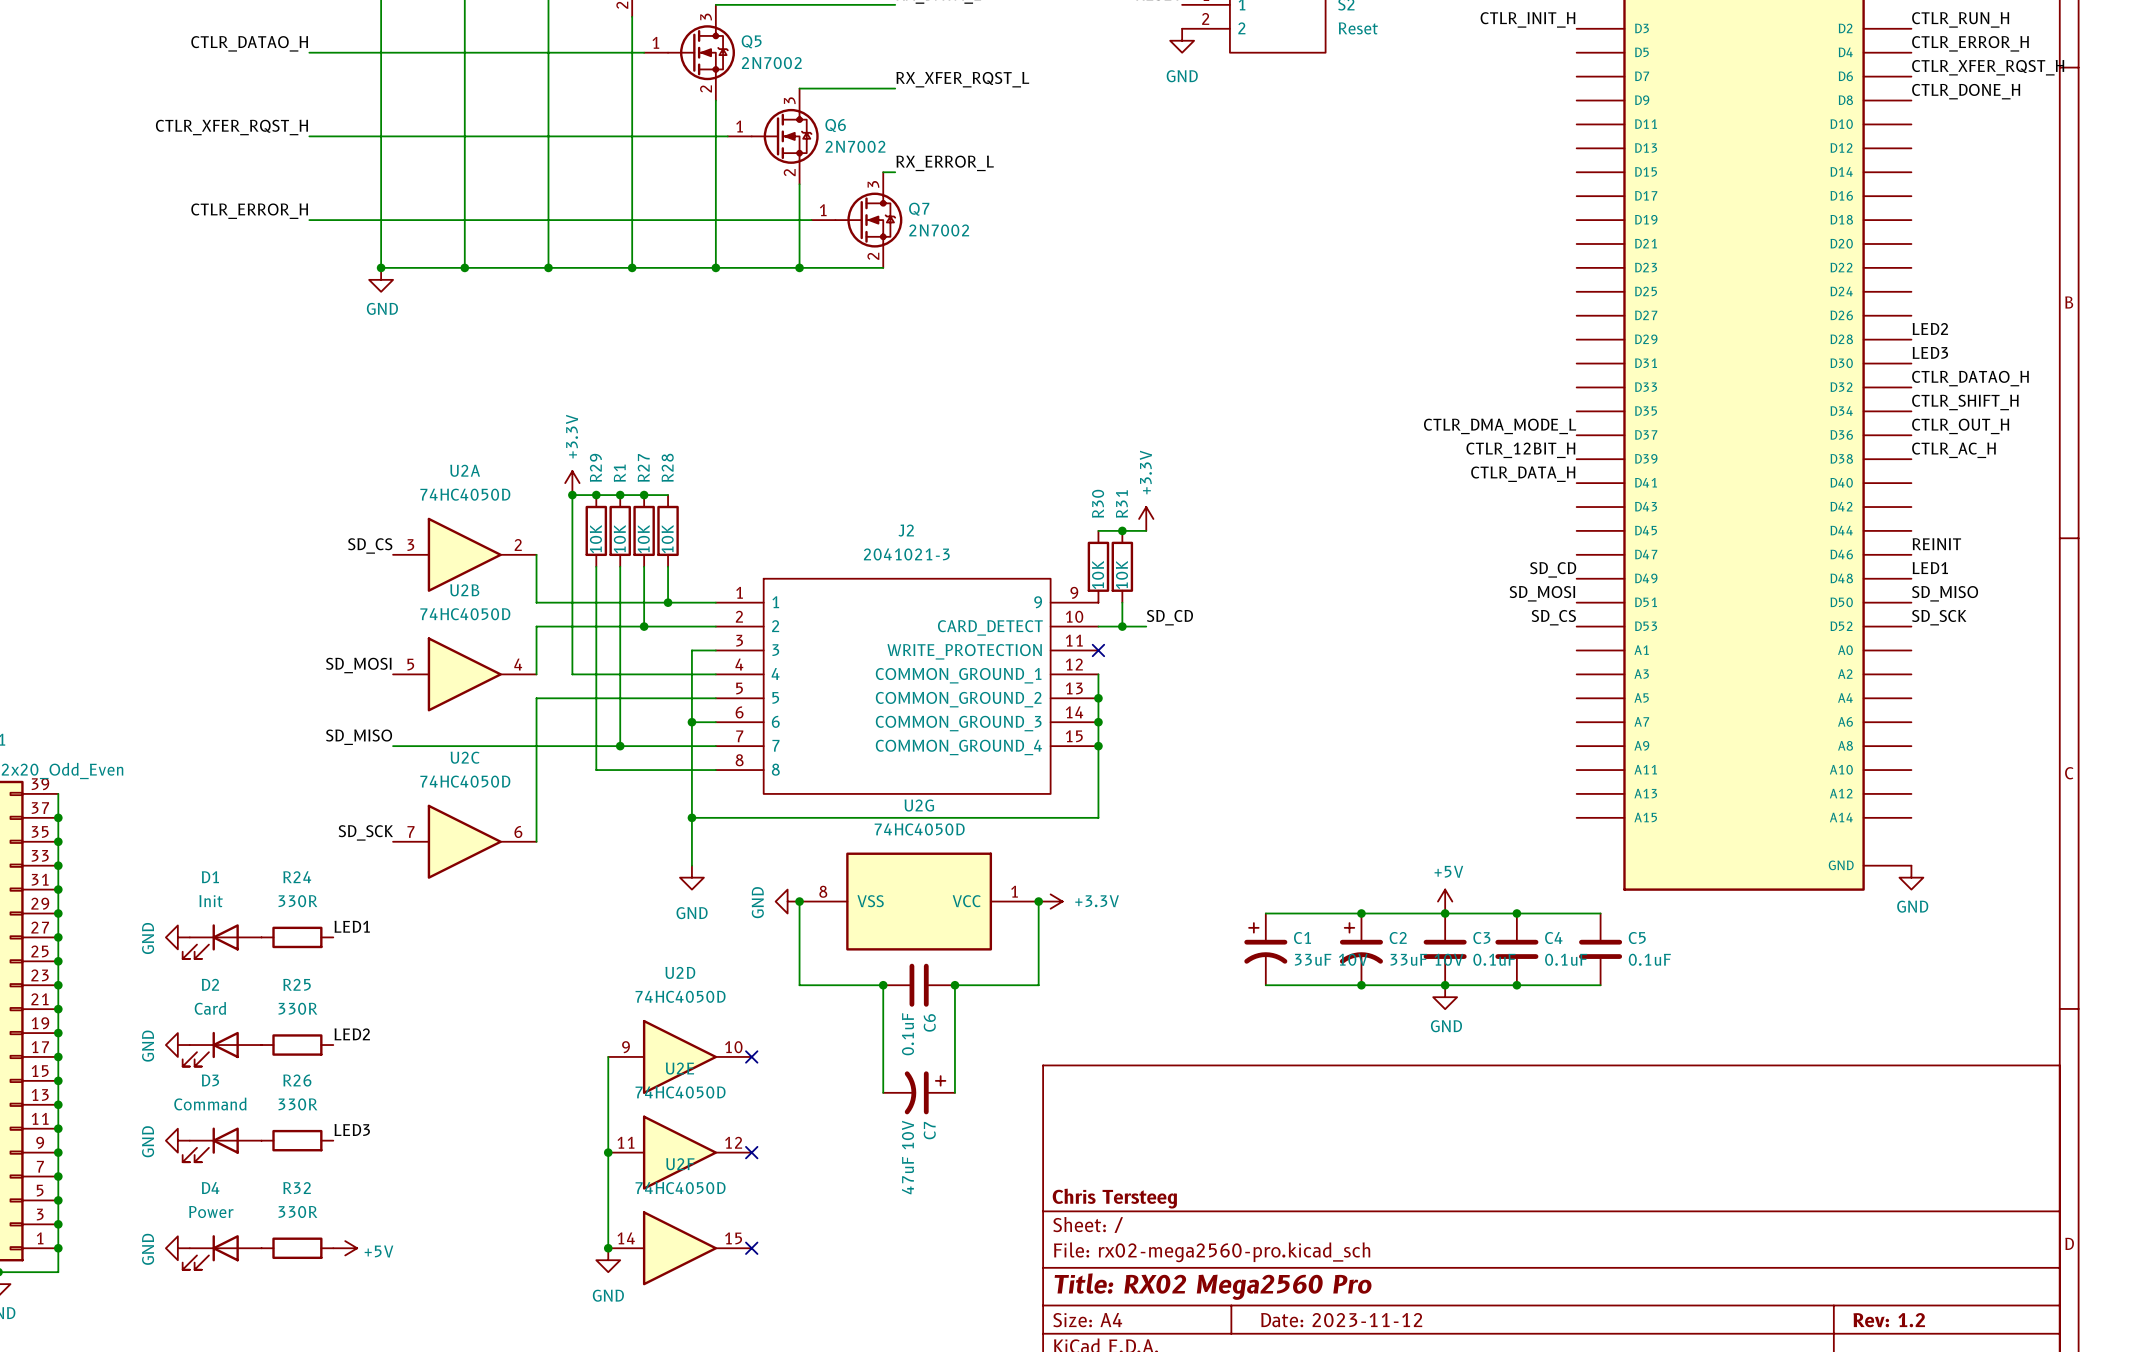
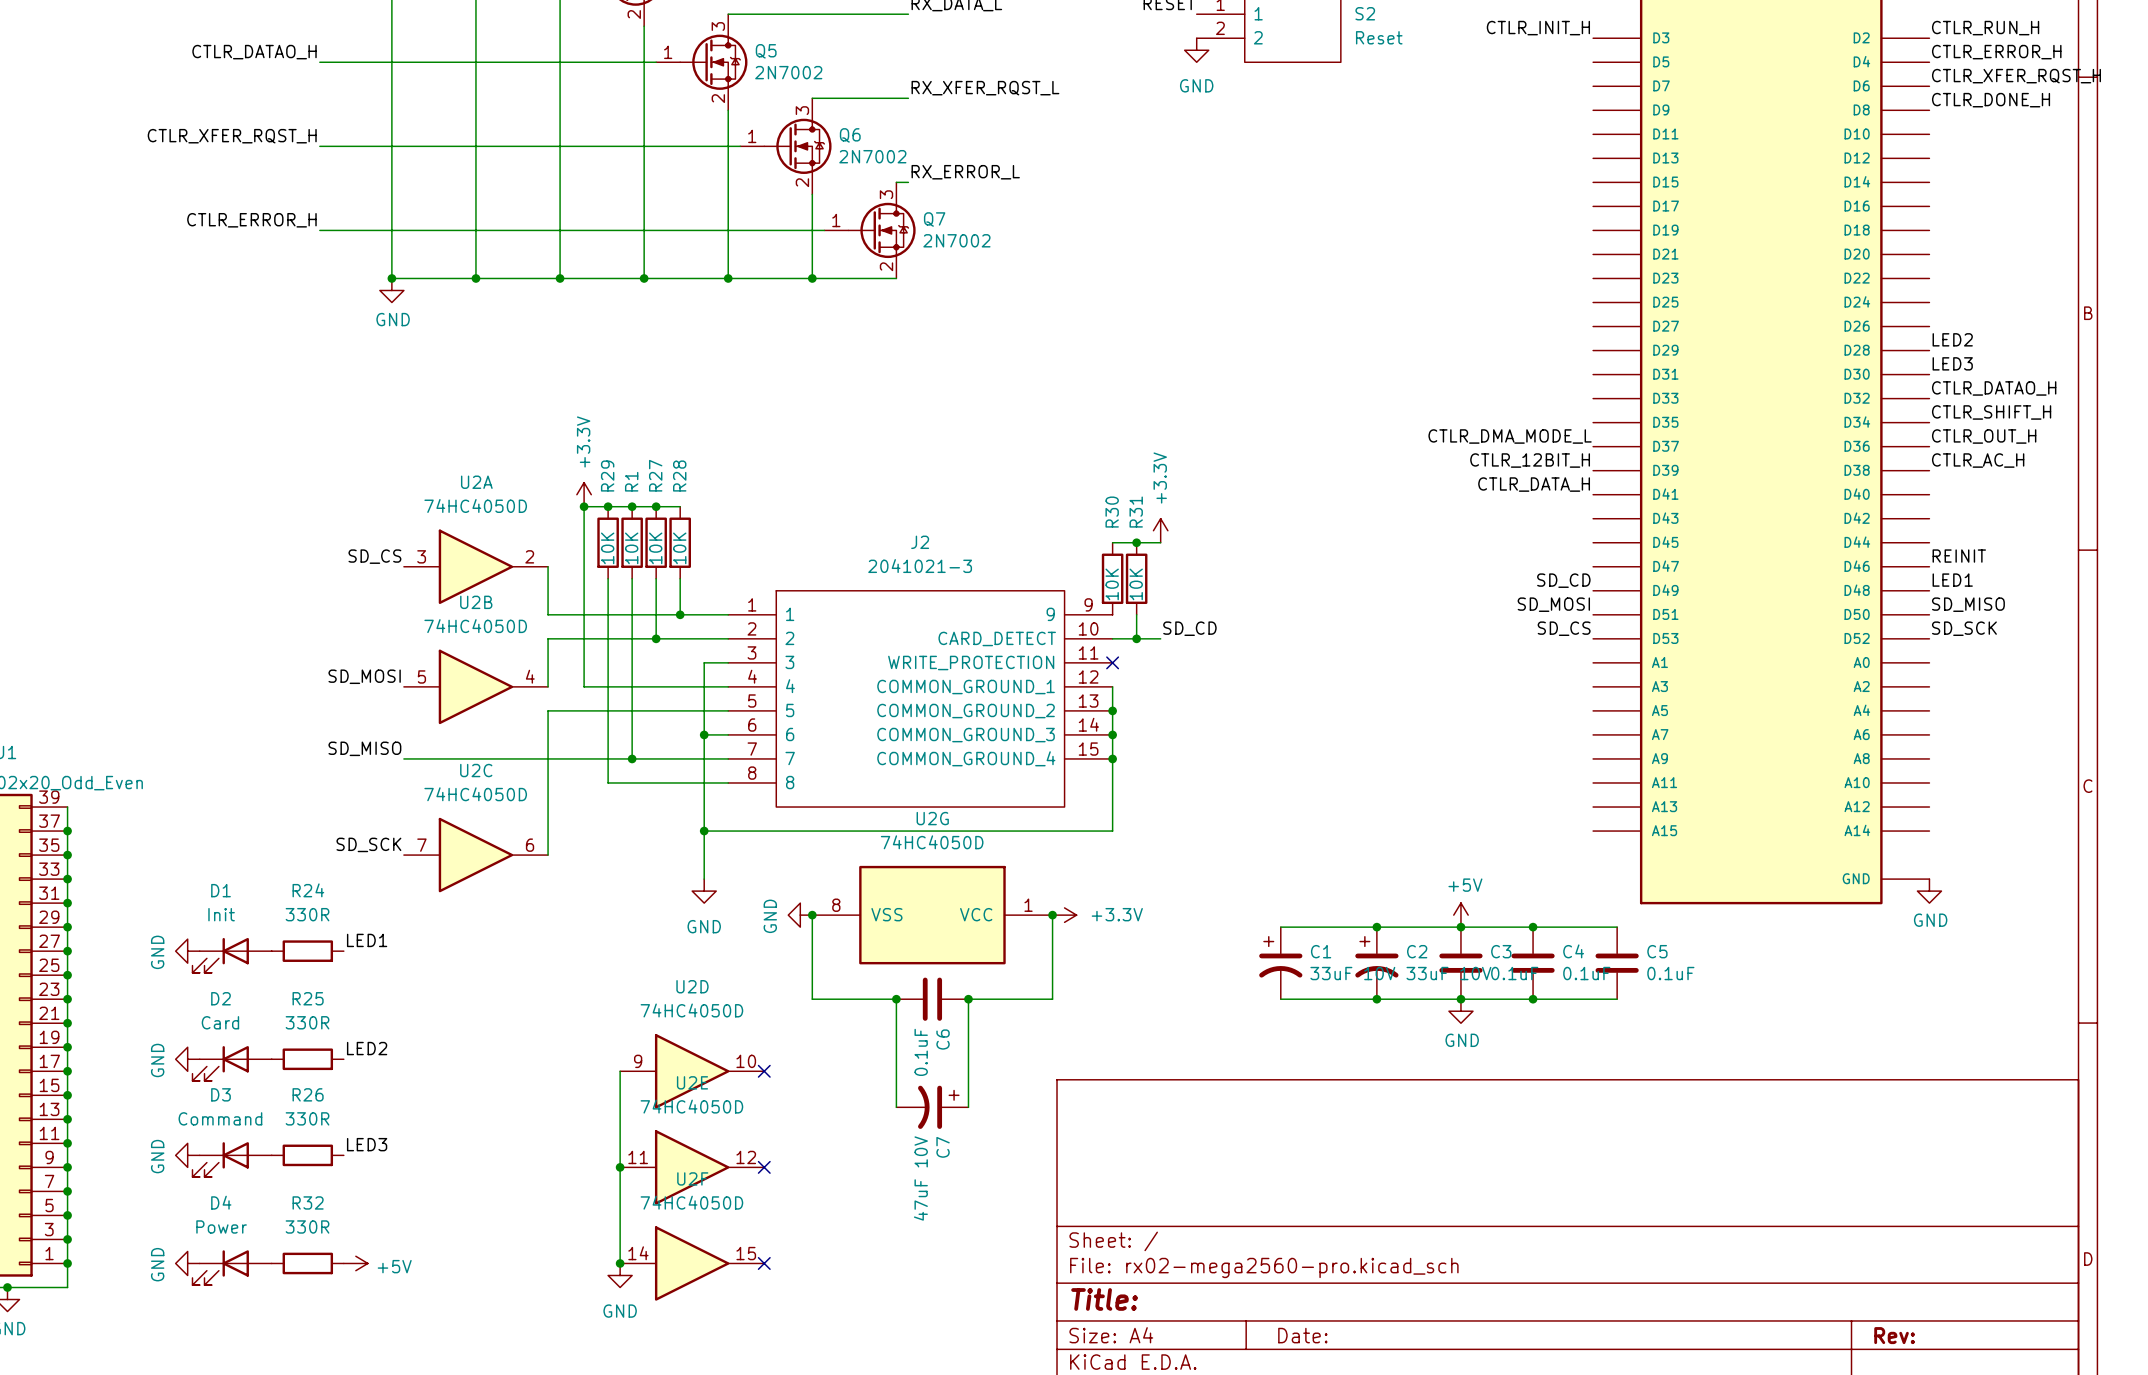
title block: Chris Tersteeg (1114, 1198) -> none
title block: Title: RX02 Mega2560 Pro (1213, 1286) -> Title: (1104, 1299)
title block: Date: 2023-11-12 (1341, 1320) -> Date: (1302, 1335)
title block: Rev: 1.2 (1889, 1320) -> Rev: (1894, 1335)

